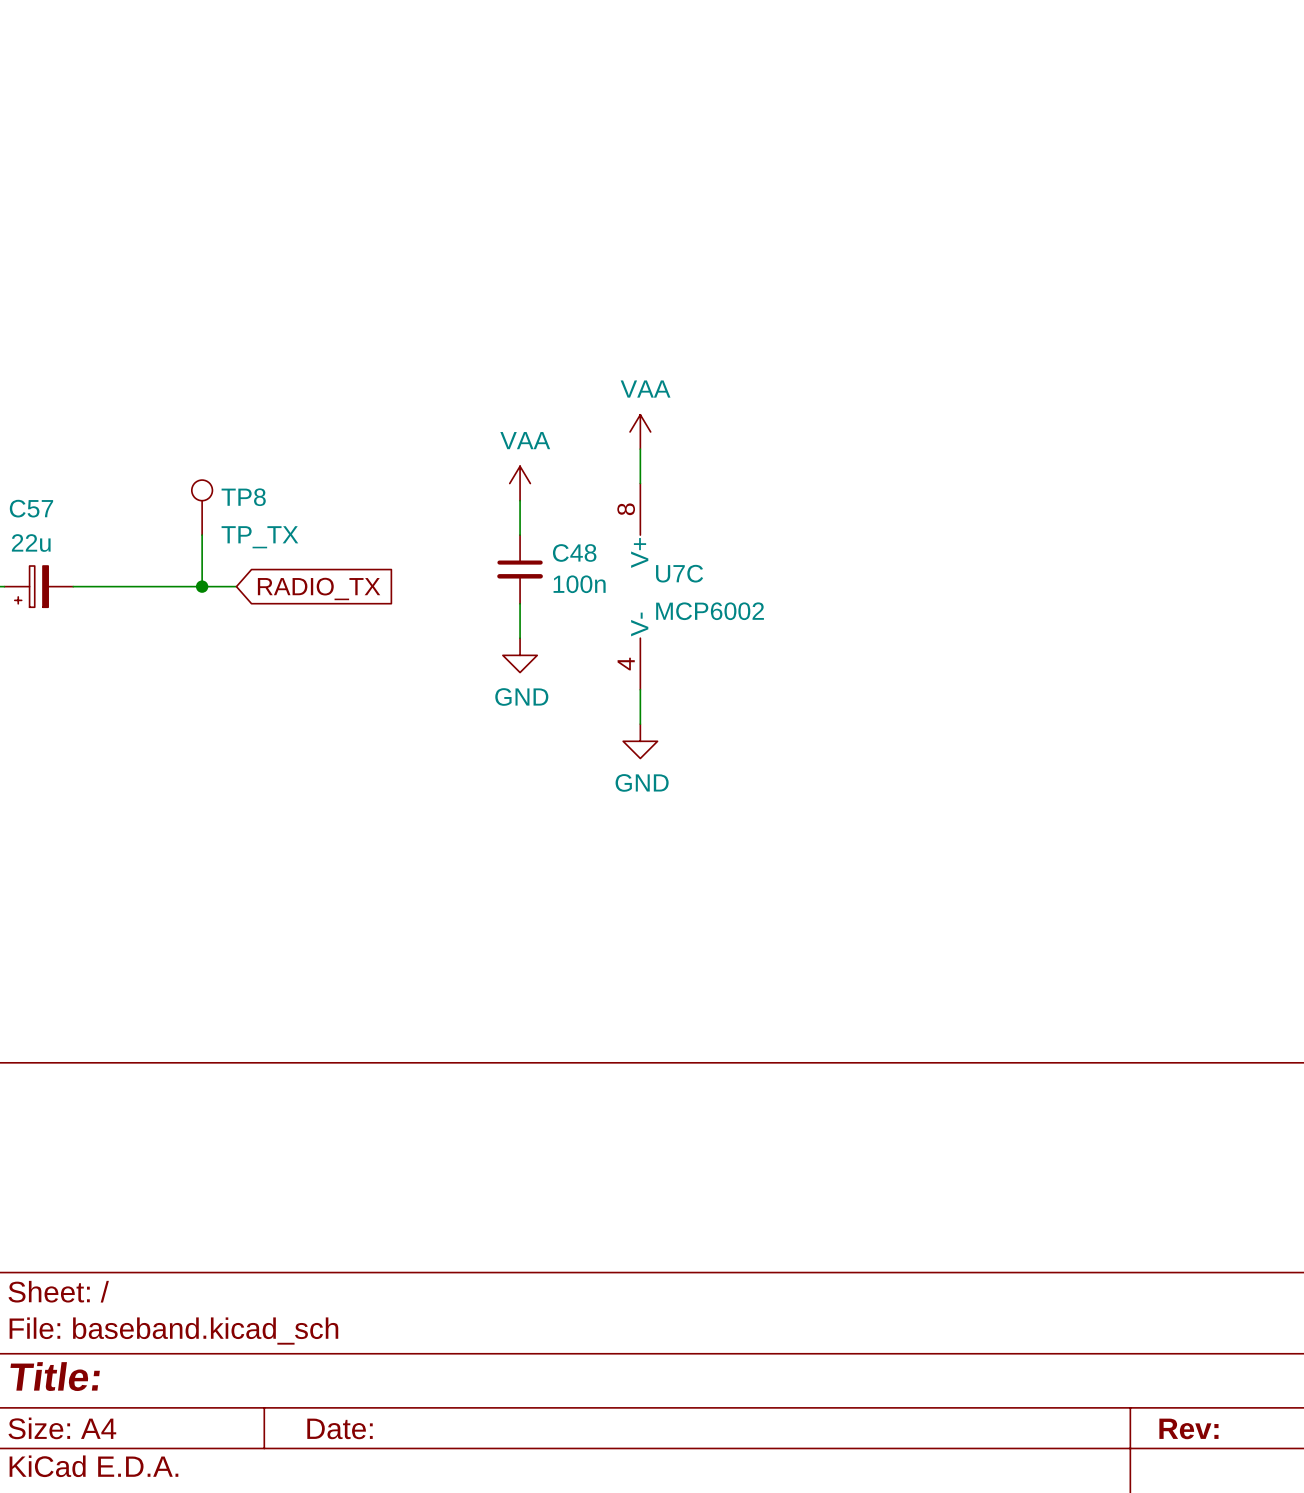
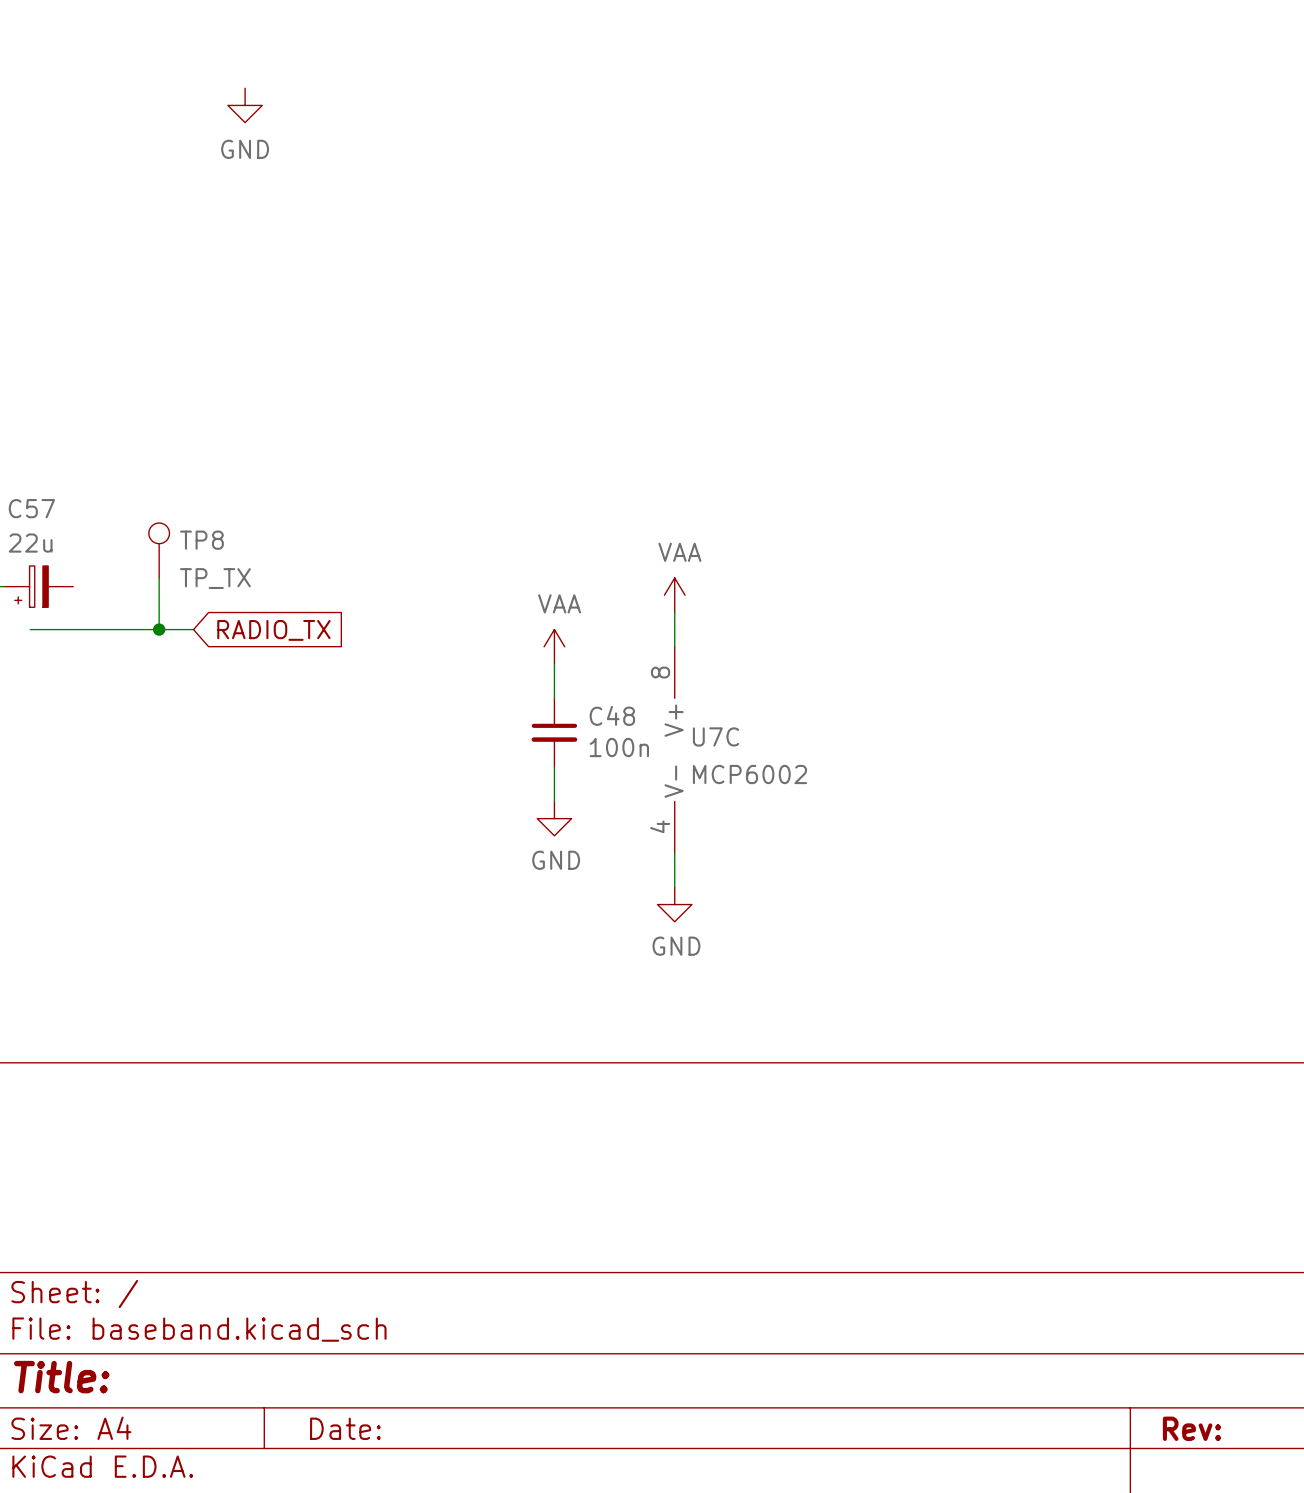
power symbol: none -> GND (245, 105)
power symbol: VAA (640, 431) -> none
wire: (640, 449) (640, 483) -> (674, 612) (674, 646)
power symbol: VAA (520, 483) -> none
wire: (520, 500) (520, 535) -> (554, 663) (554, 698)
TP8 position: (202, 507) -> (159, 550)
wire: (202, 535) (202, 586) -> (159, 578) (159, 629)
C48 position: (520, 569) -> (554, 732)
wire: (73, 586) (236, 586) -> (30, 629) (193, 629)
junction position: (202, 586) -> (159, 629)
U7C position: (640, 586) -> (674, 749)
global label position: RADIO_TX (319, 588) -> RADIO_TX (273, 630)
power symbol: none -> VAA (674, 595)
wire: (520, 603) (520, 638) -> (554, 767) (554, 801)
power symbol: none -> VAA (554, 646)
power symbol: GND (520, 655) -> none
wire: (640, 689) (640, 724) -> (674, 853) (674, 887)
power symbol: GND (640, 741) -> none
power symbol: none -> GND (554, 818)
power symbol: none -> GND (674, 904)

